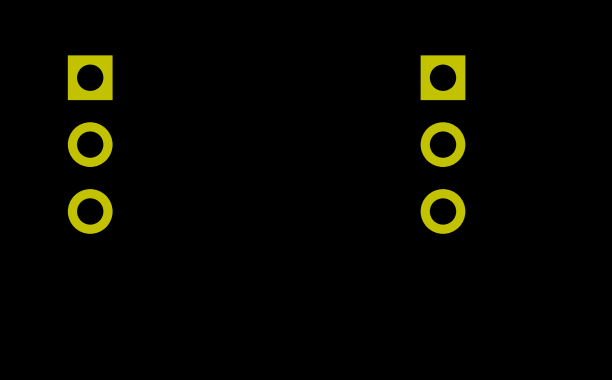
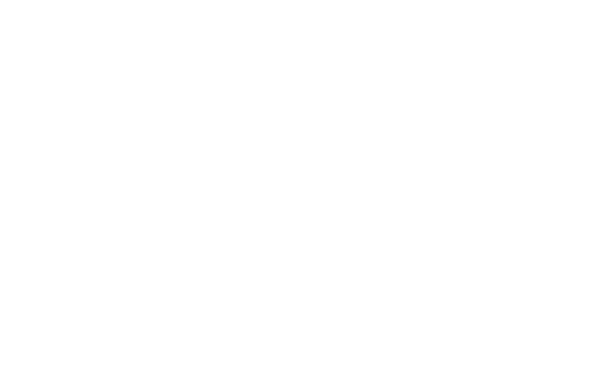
part: (90, 144) -> none
part: (442, 144) -> none

